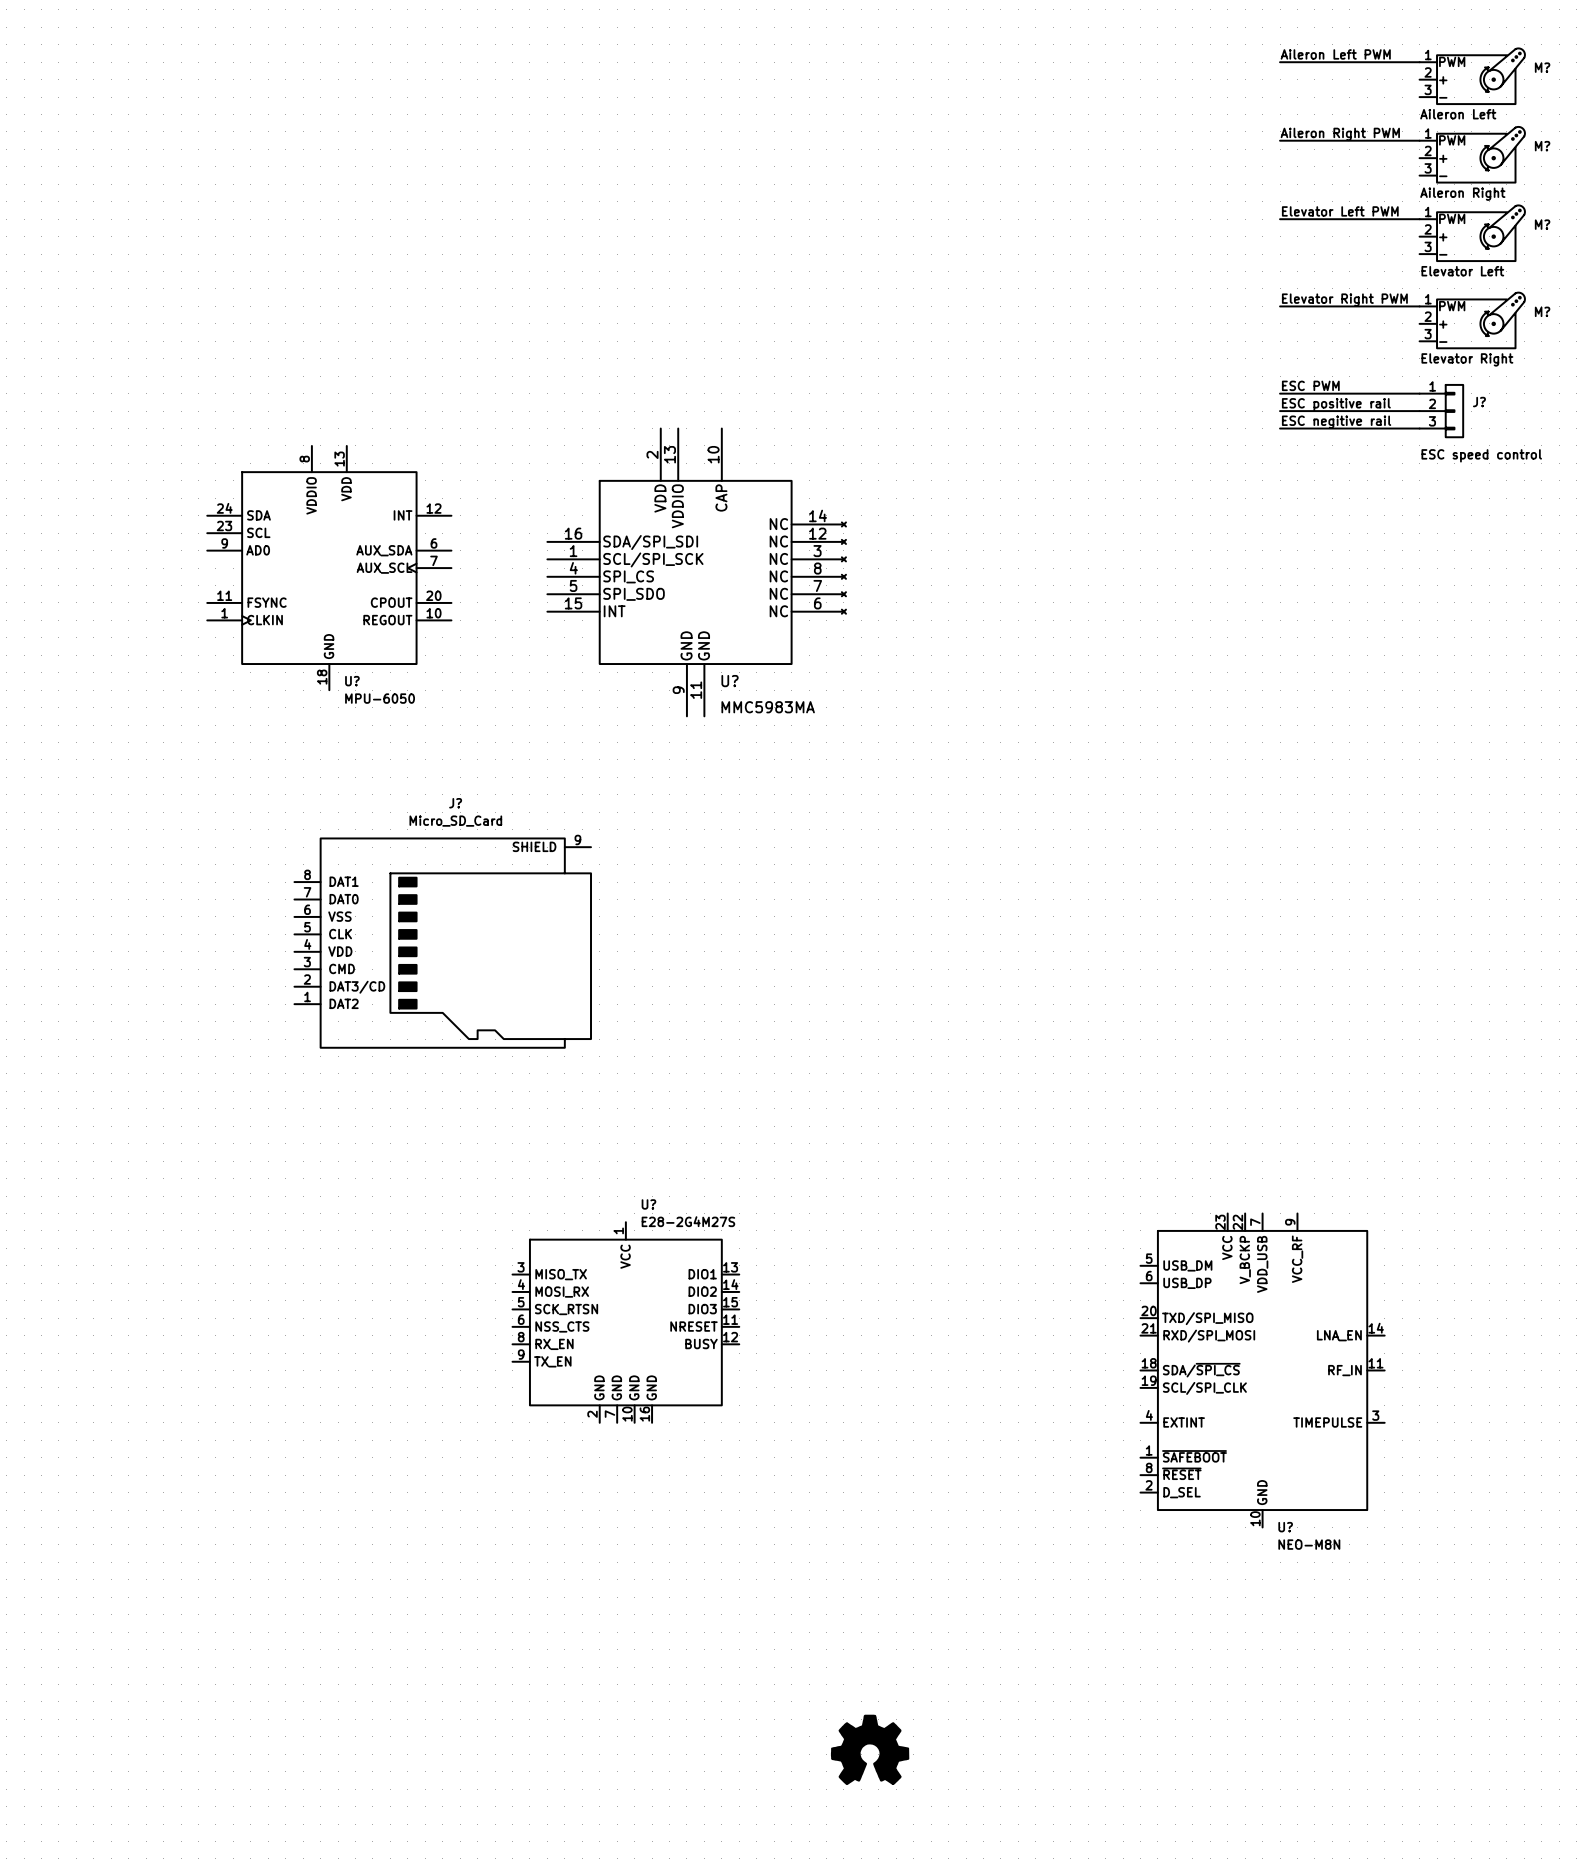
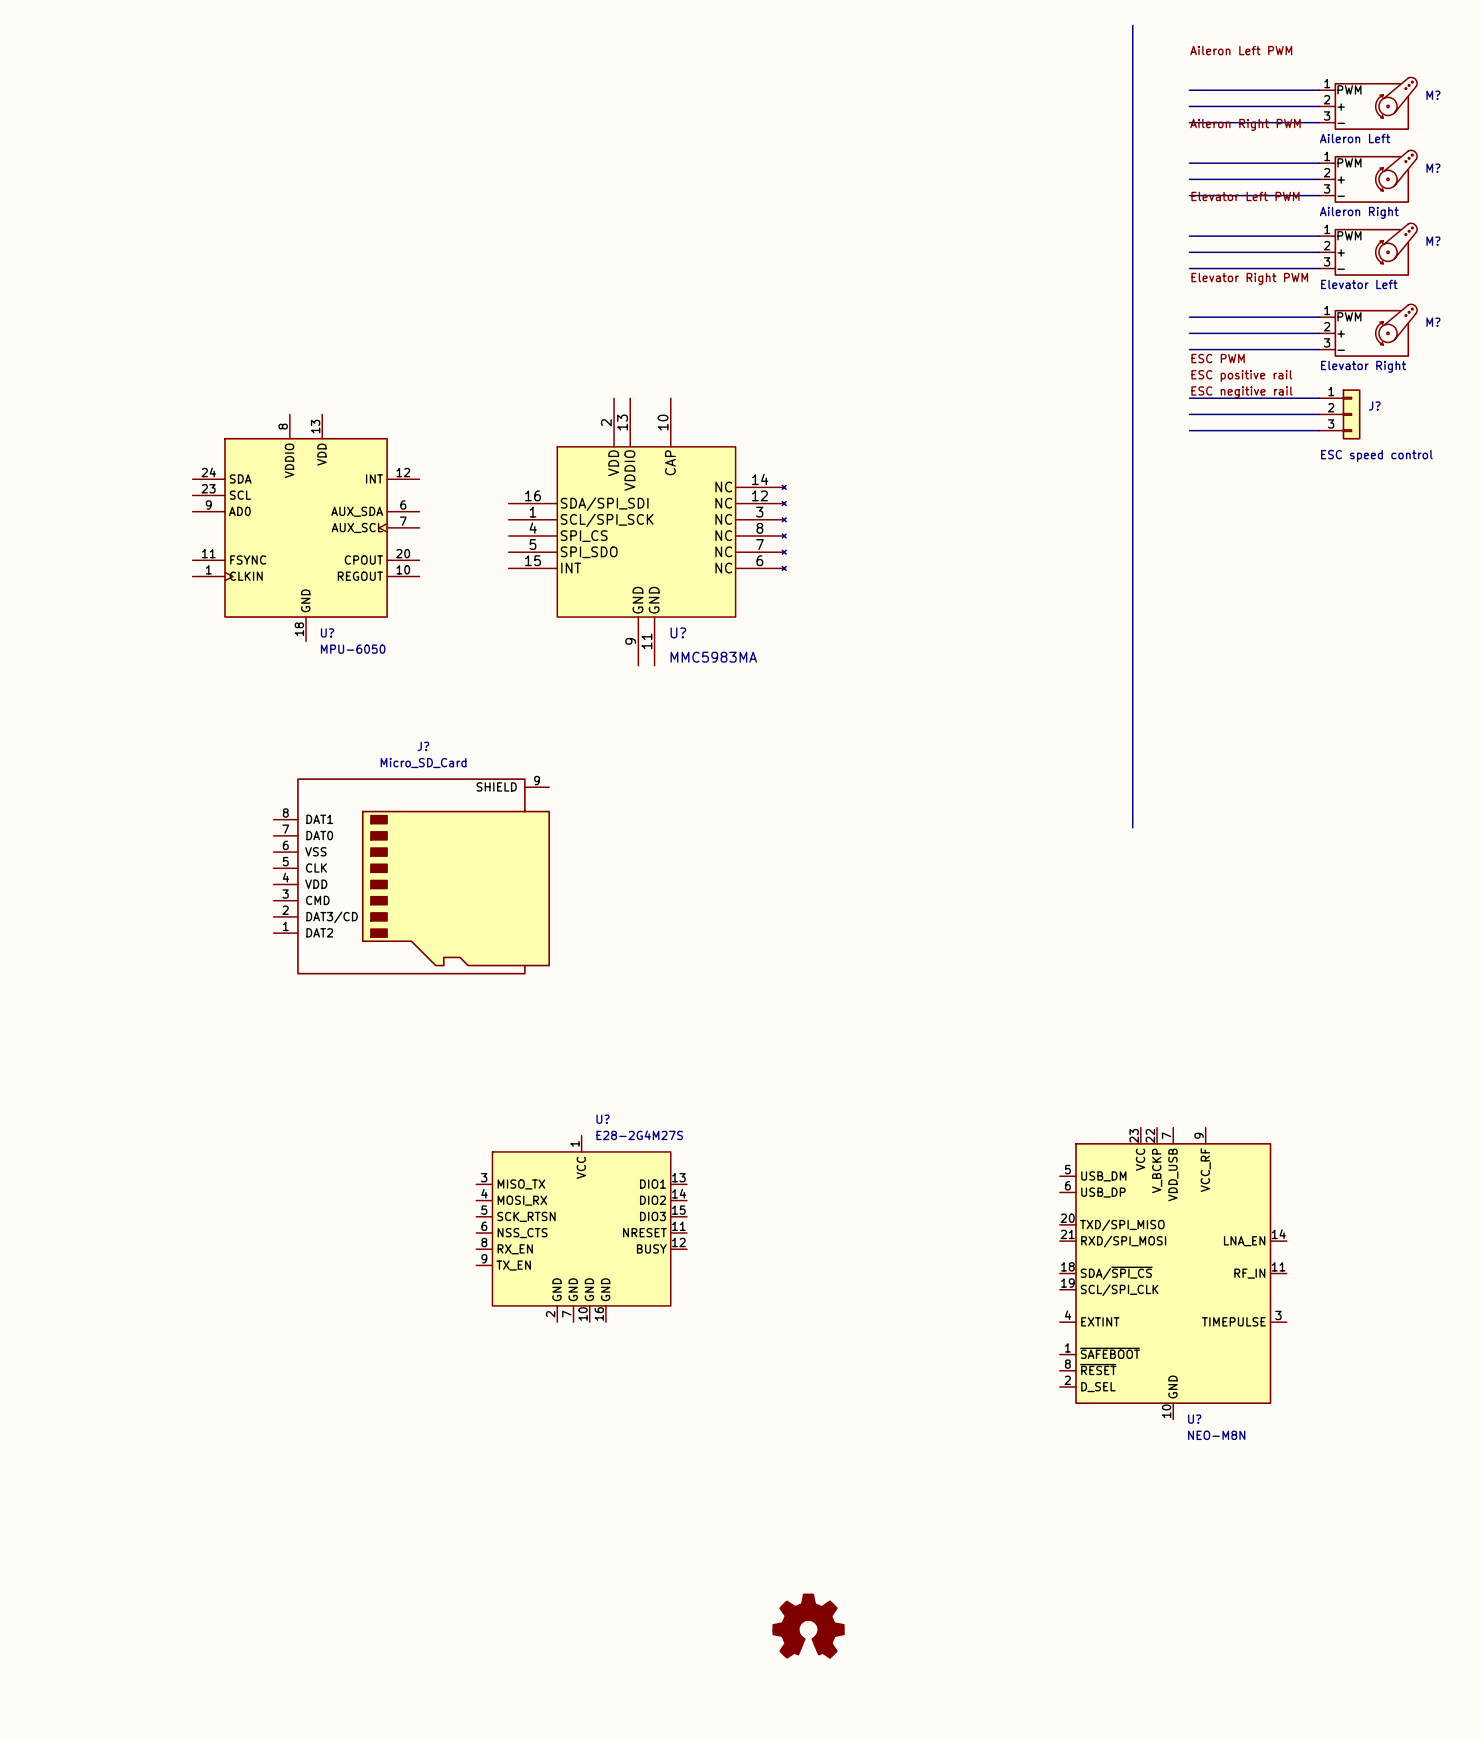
line: none -> (1132, 25) (1132, 827)
wire: (1280, 62) (1419, 62) -> (1189, 106) (1319, 106)
M? position: (1472, 76) -> (1368, 103)
wire: none -> (1189, 90) (1319, 90)
wire: none -> (1189, 122) (1319, 122)
wire: (1280, 140) (1419, 140) -> (1189, 179) (1319, 179)
M? position: (1472, 155) -> (1368, 176)
wire: none -> (1189, 163) (1319, 163)
wire: none -> (1189, 195) (1319, 195)
wire: (1280, 219) (1419, 219) -> (1189, 252) (1319, 252)
M? position: (1472, 233) -> (1368, 249)
wire: none -> (1189, 236) (1319, 236)
wire: none -> (1189, 268) (1319, 268)
wire: (1280, 306) (1419, 306) -> (1189, 333) (1319, 333)
M? position: (1472, 320) -> (1368, 330)
wire: none -> (1189, 317) (1319, 317)
wire: none -> (1189, 349) (1319, 349)
wire: (1280, 393) (1419, 393) -> (1189, 414) (1319, 414)
wire: (1280, 411) (1419, 411) -> (1189, 430) (1319, 430)
J? position: (1441, 411) -> (1339, 414)

